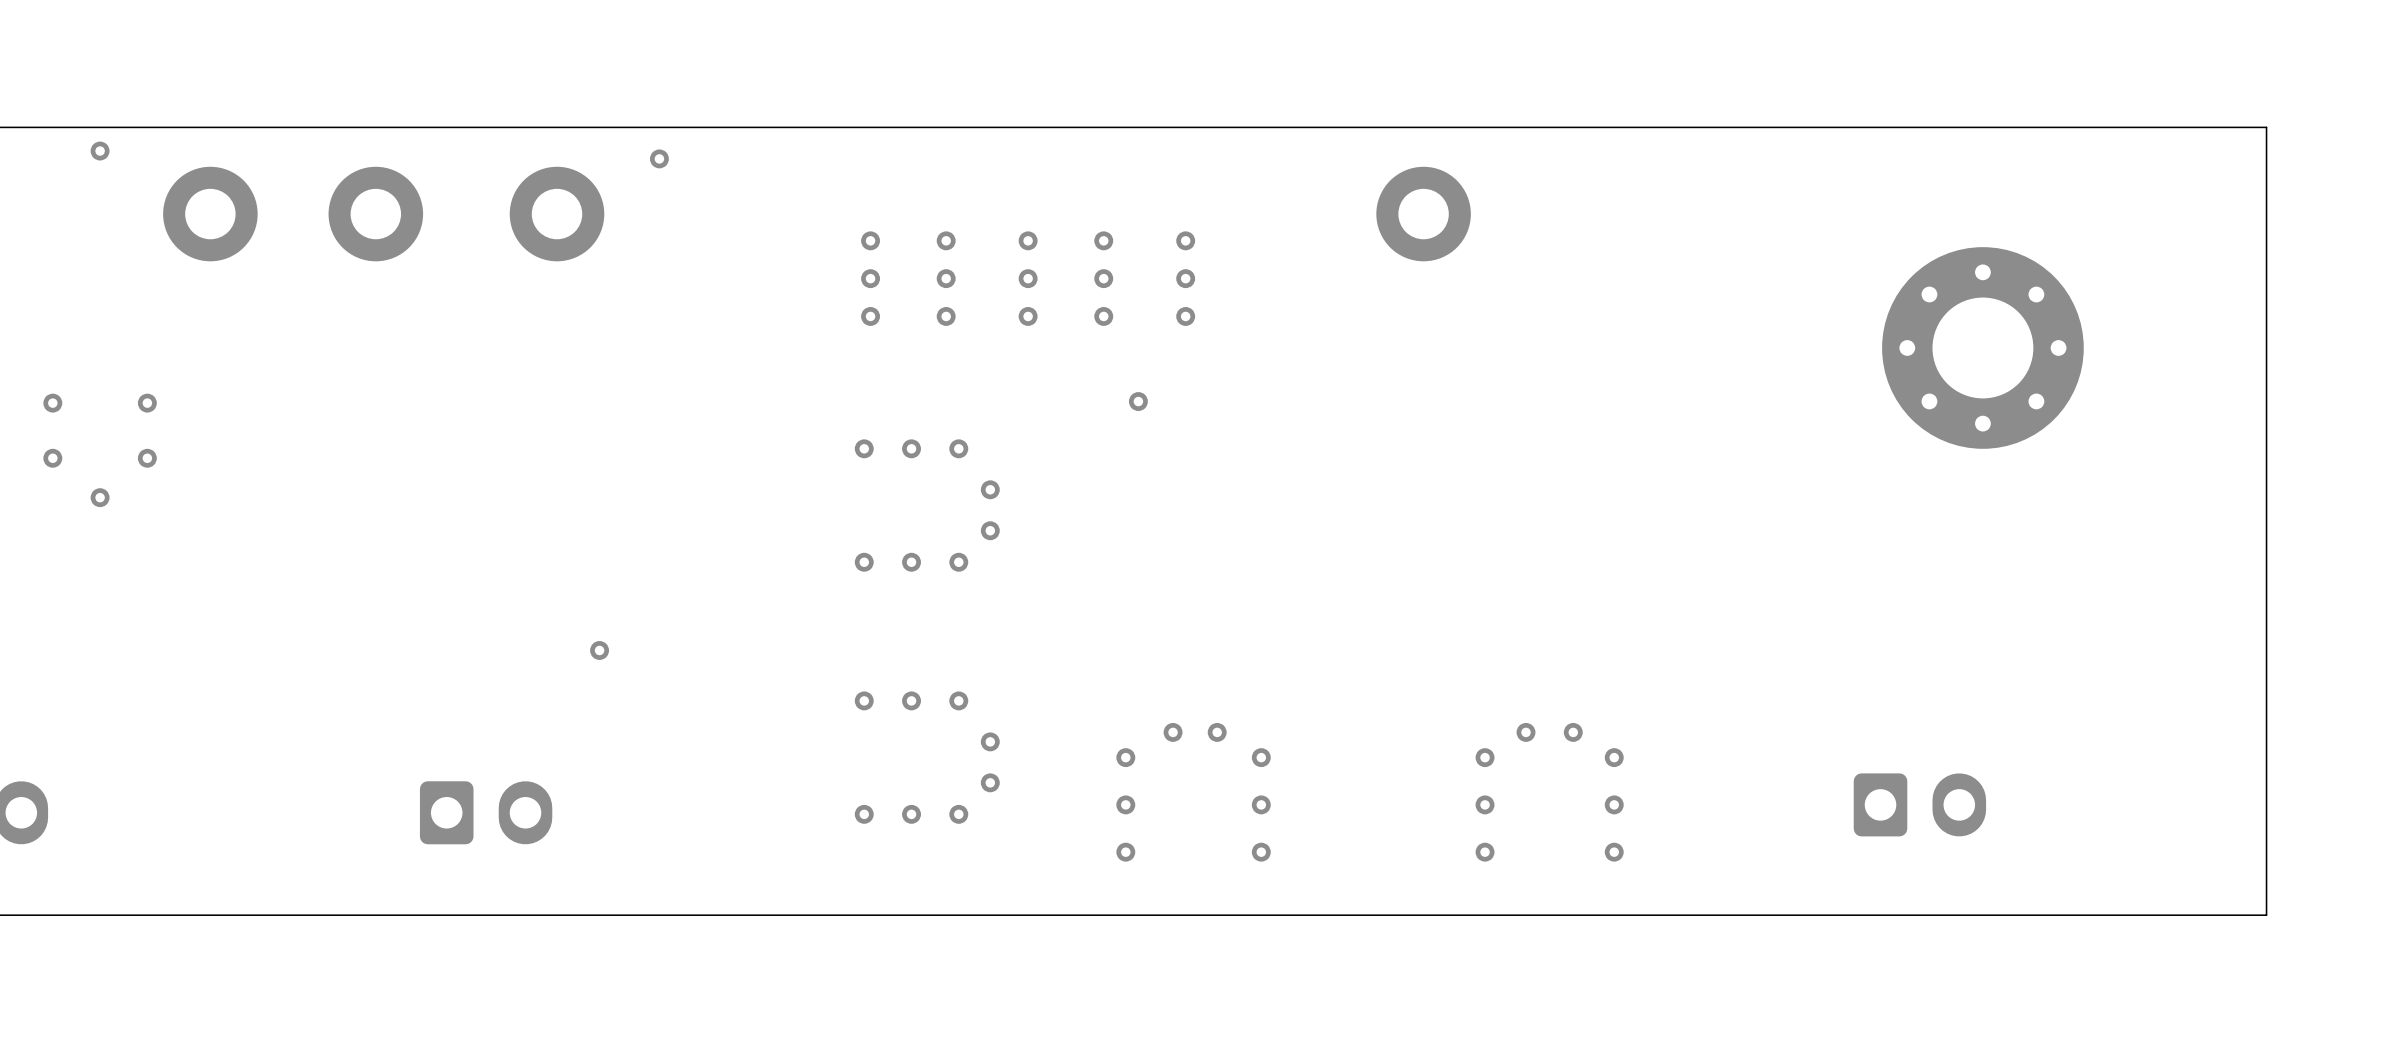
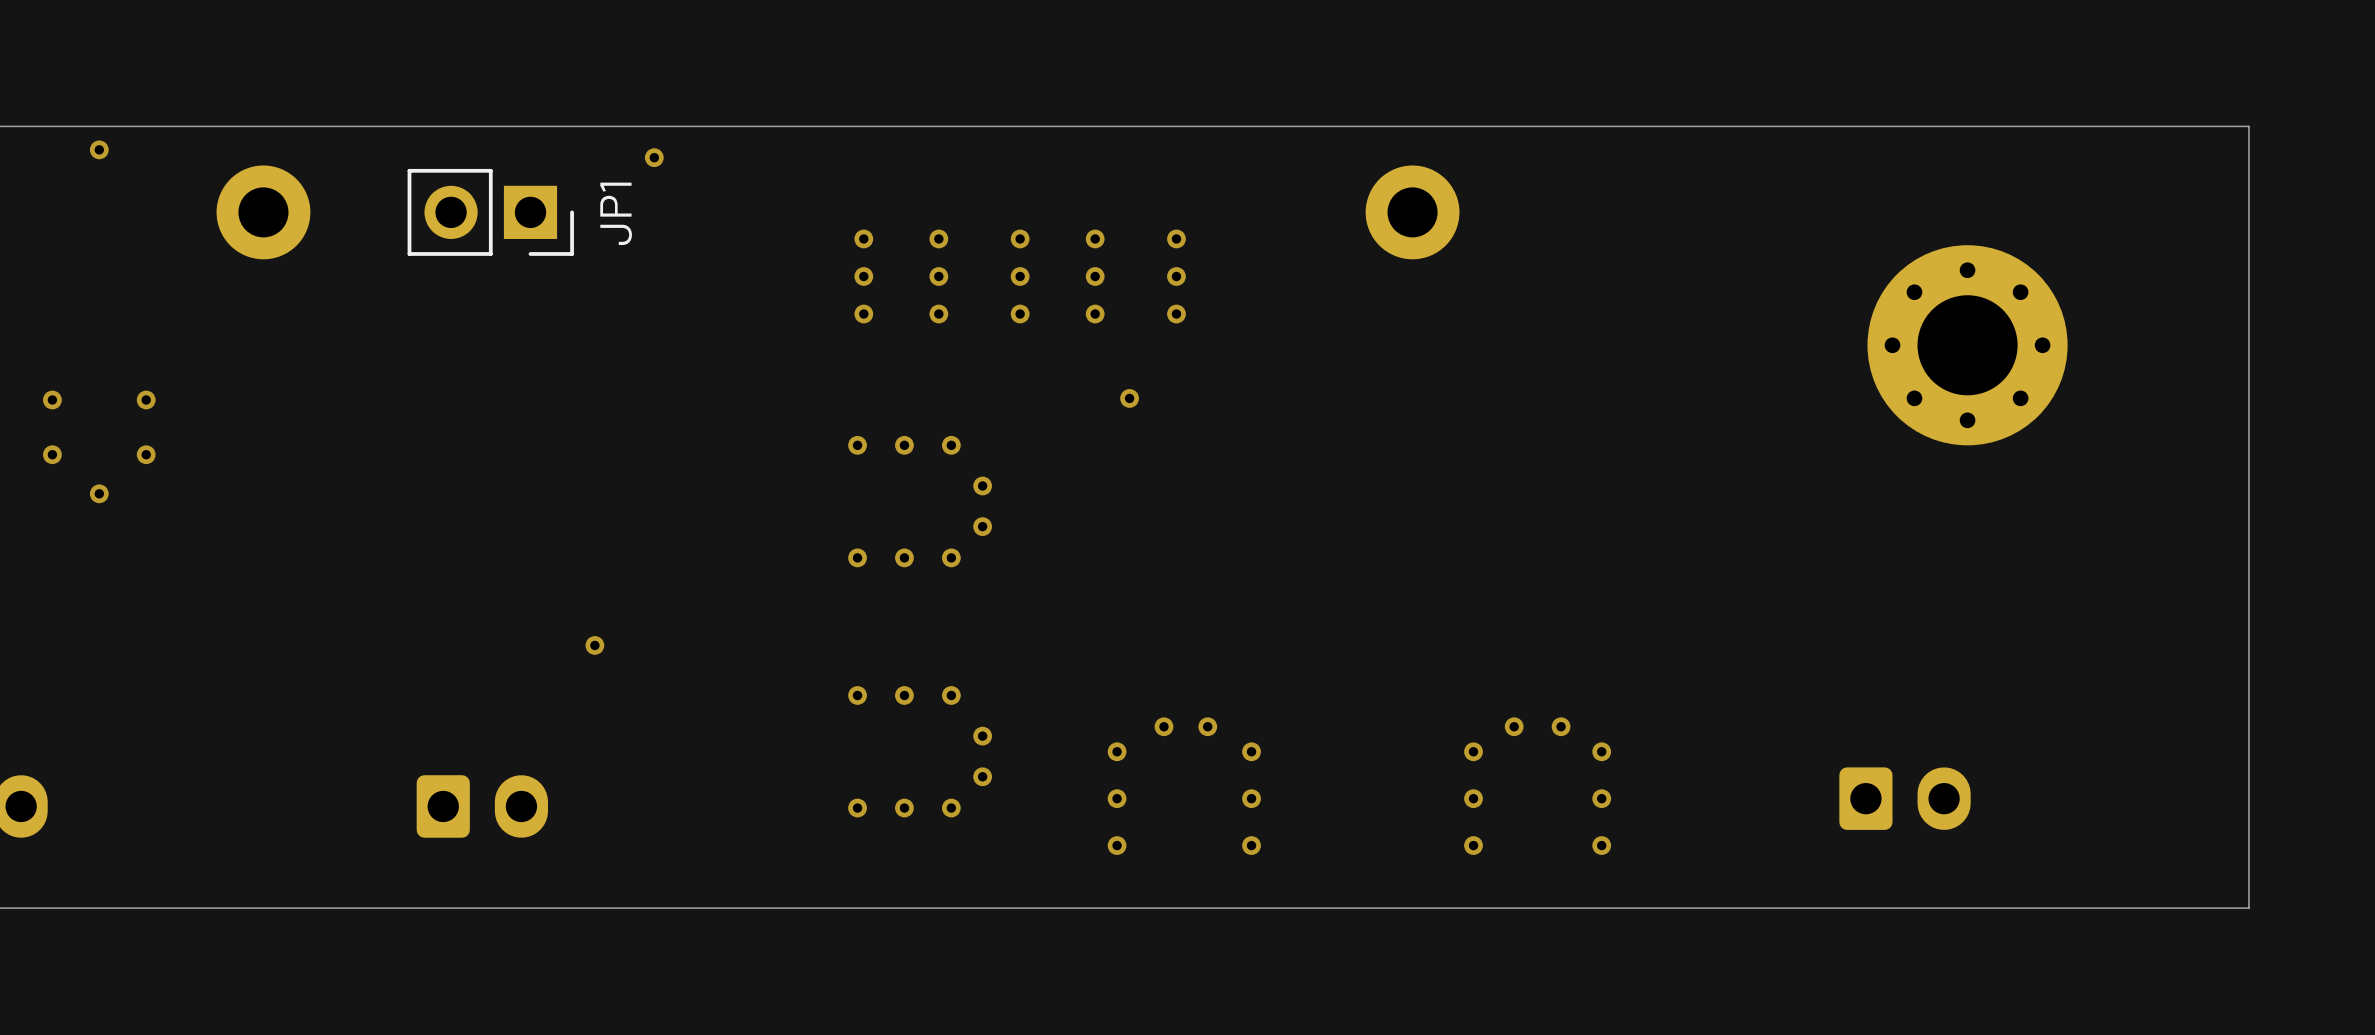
part: (210, 214) -> none
part: none -> (263, 212)
part: (375, 214) -> none
JP1: none -> (490, 212)
part: (557, 214) -> none

